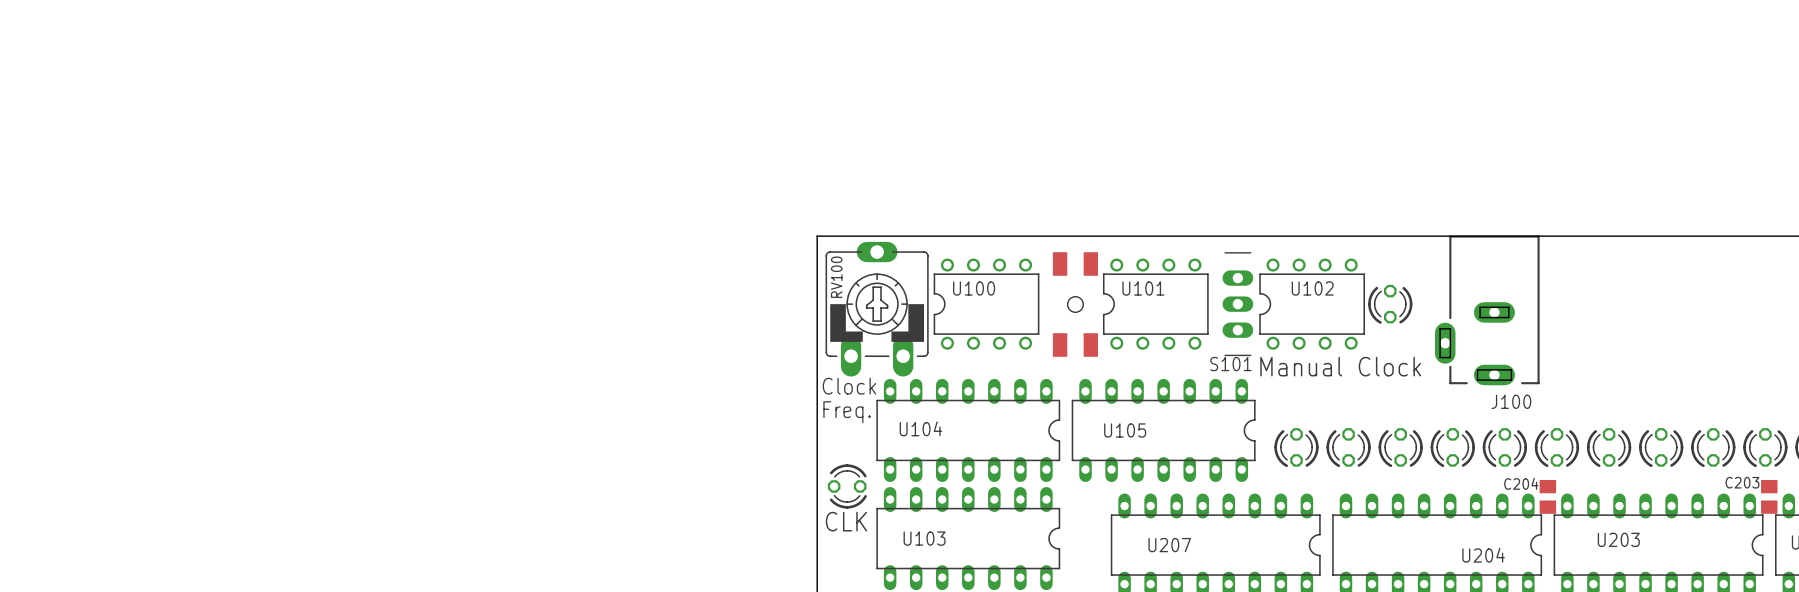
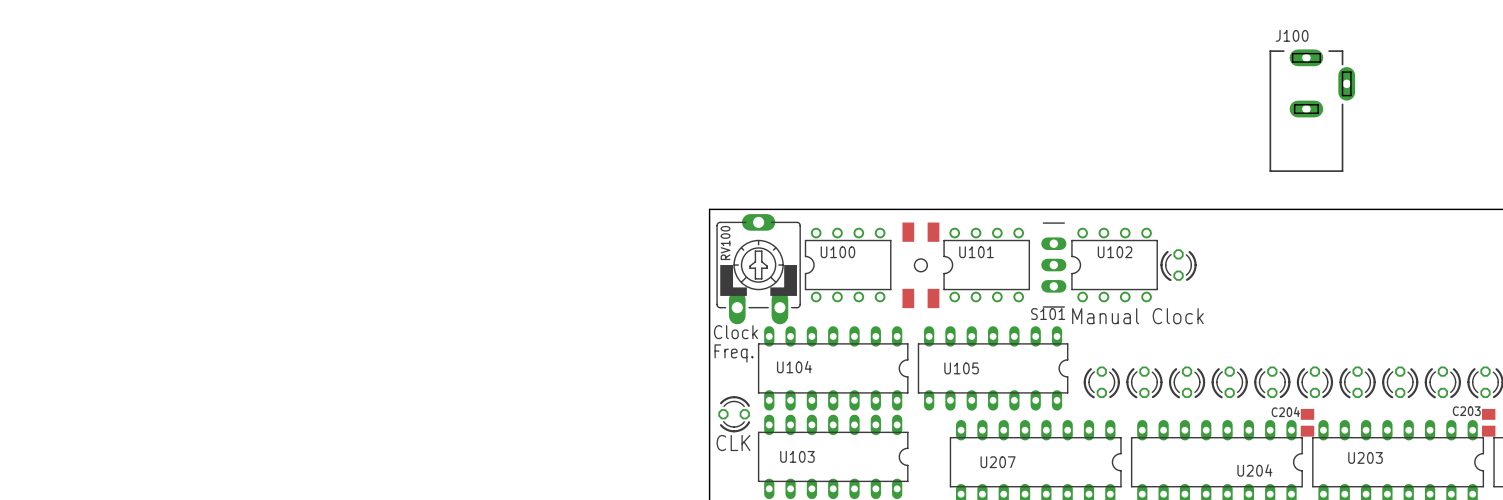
J100 rotation: 0° (1487, 310) -> 180° (1312, 110)
J100 position: (1487, 310) -> (1312, 110)

